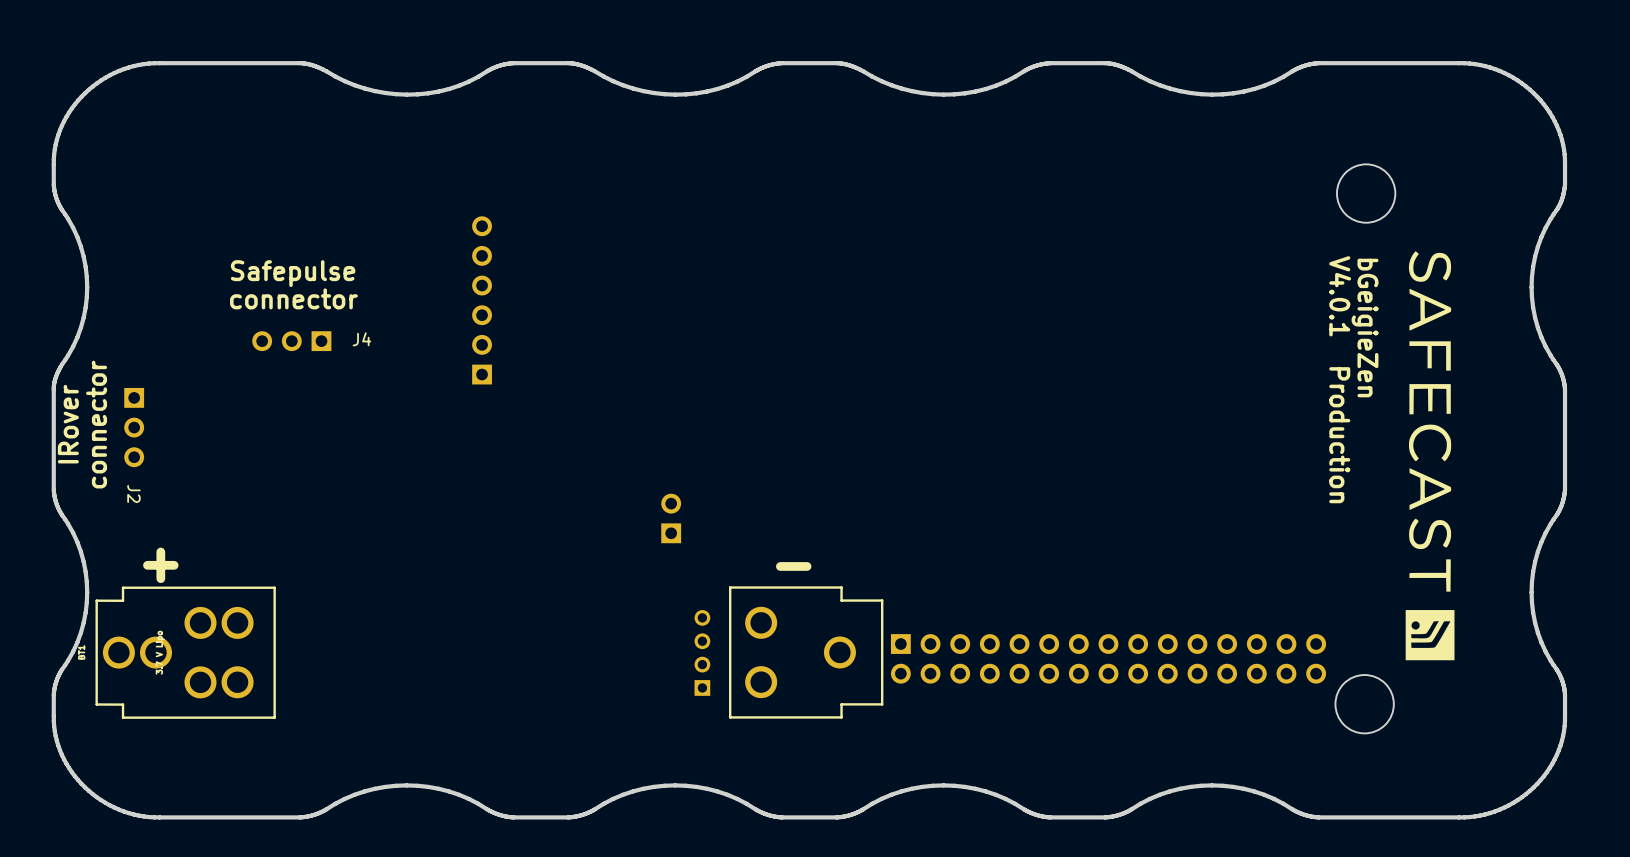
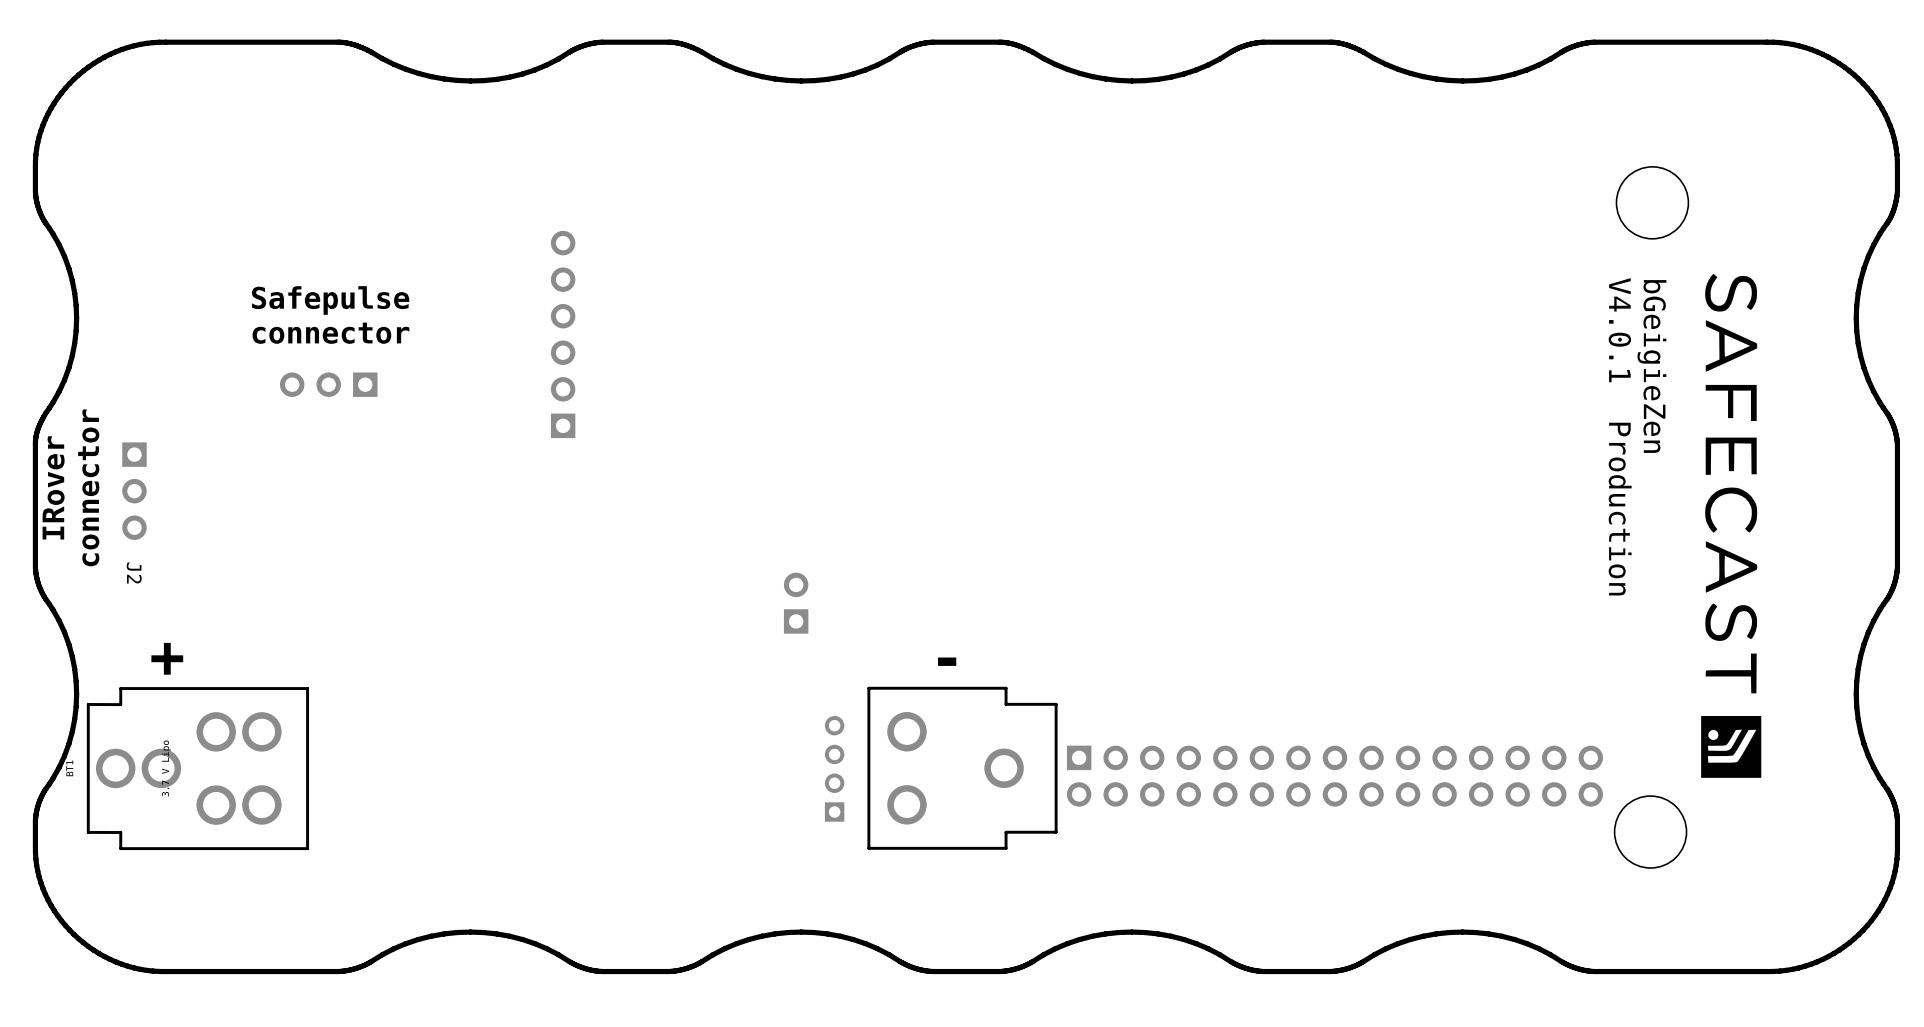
J4 name: J4 (361, 339) -> none

